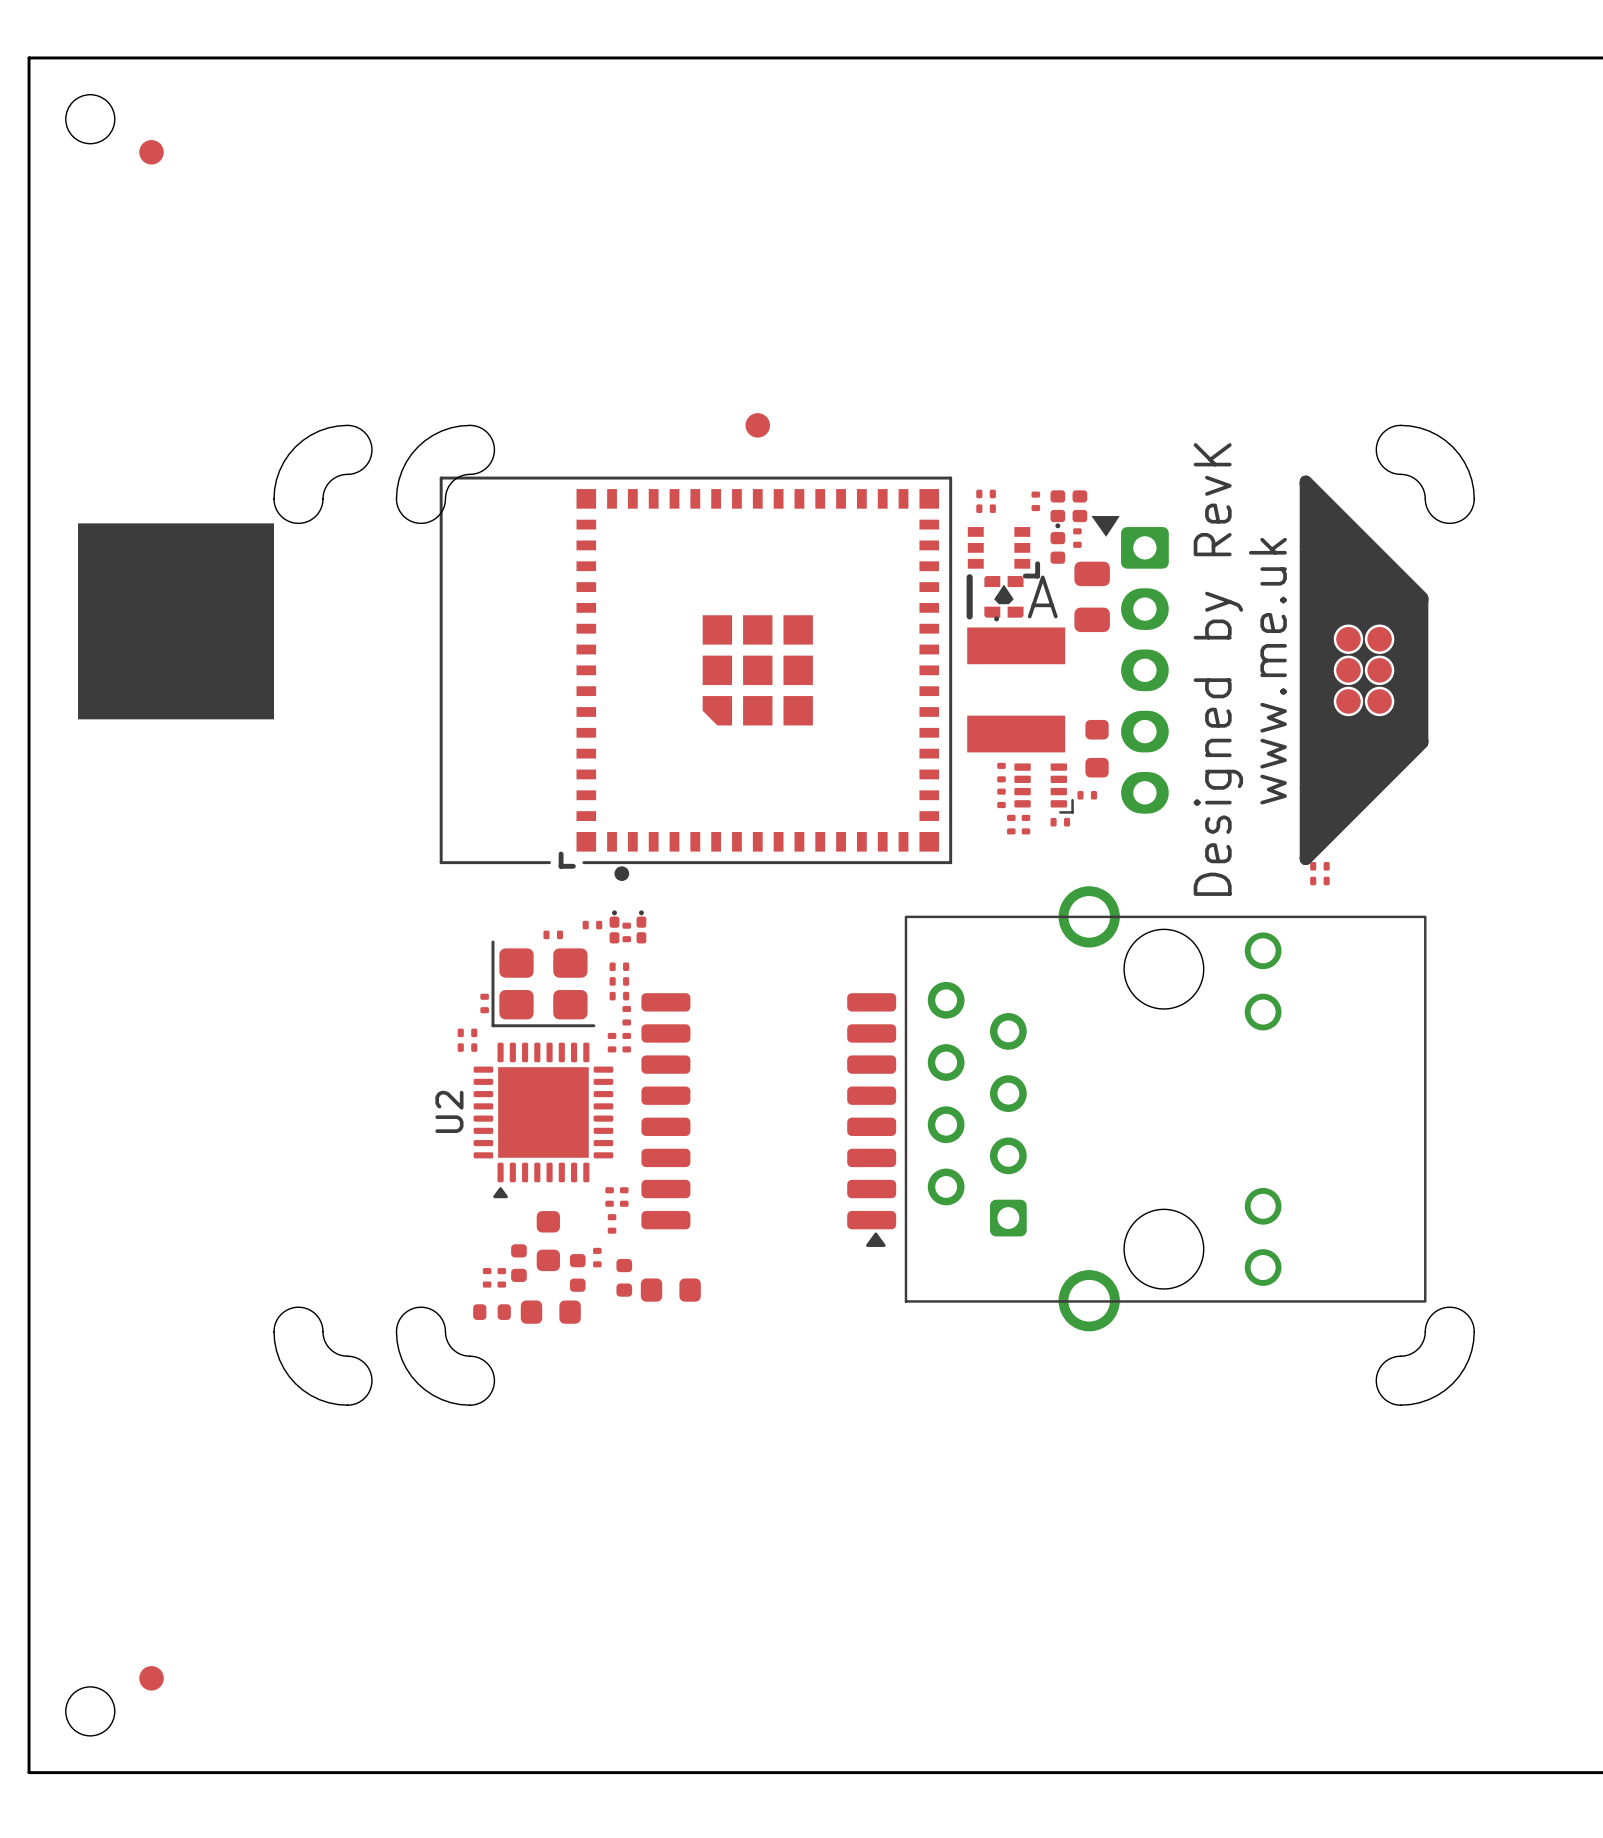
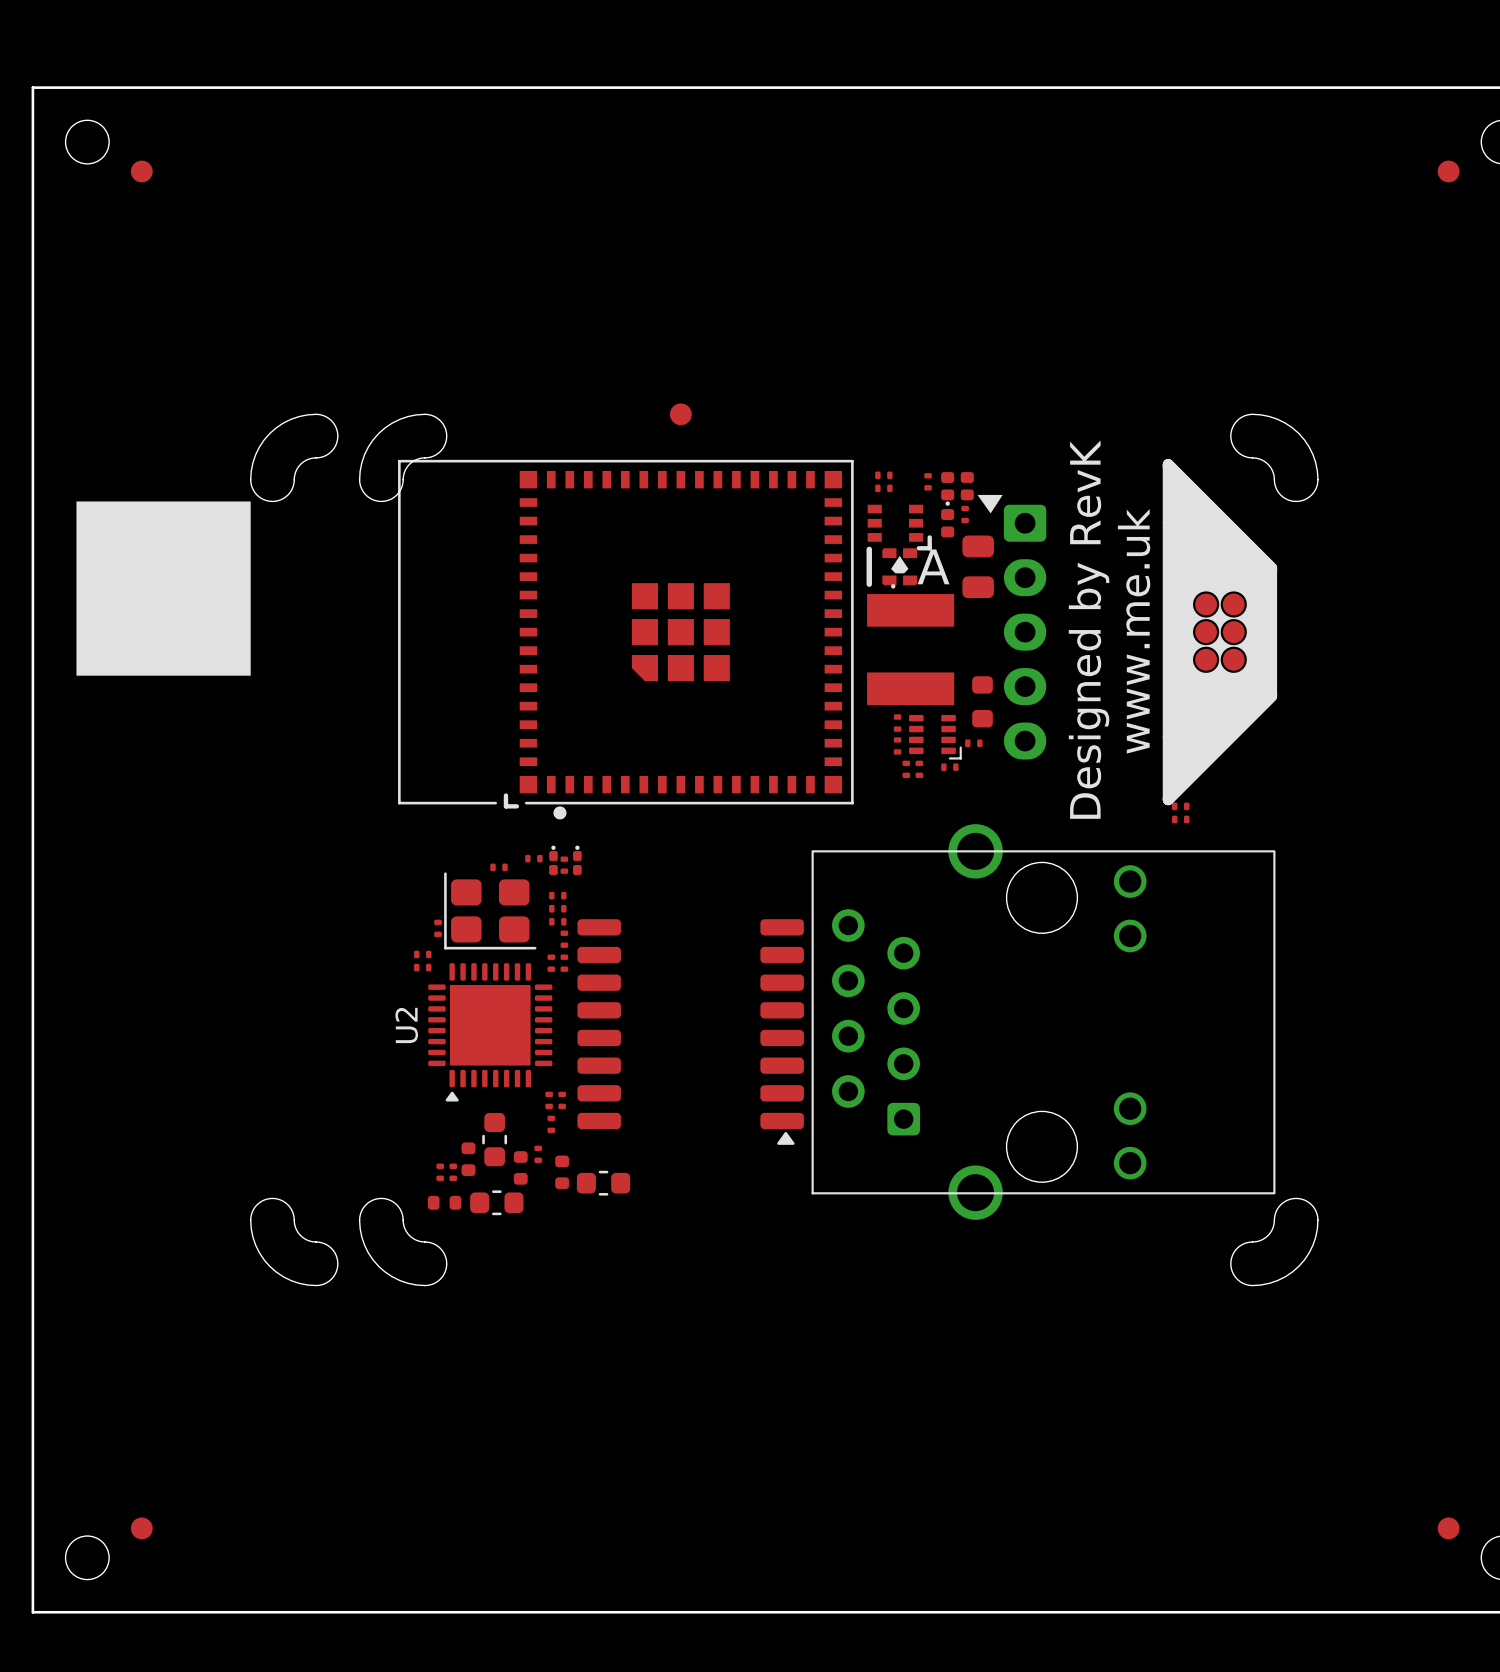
part footprint: [536, 1211, 560, 1272] -> [482, 1112, 508, 1167]
part footprint: [640, 1278, 701, 1302] -> [576, 1170, 631, 1196]
part footprint: [520, 1300, 581, 1324] -> [470, 1190, 524, 1216]

